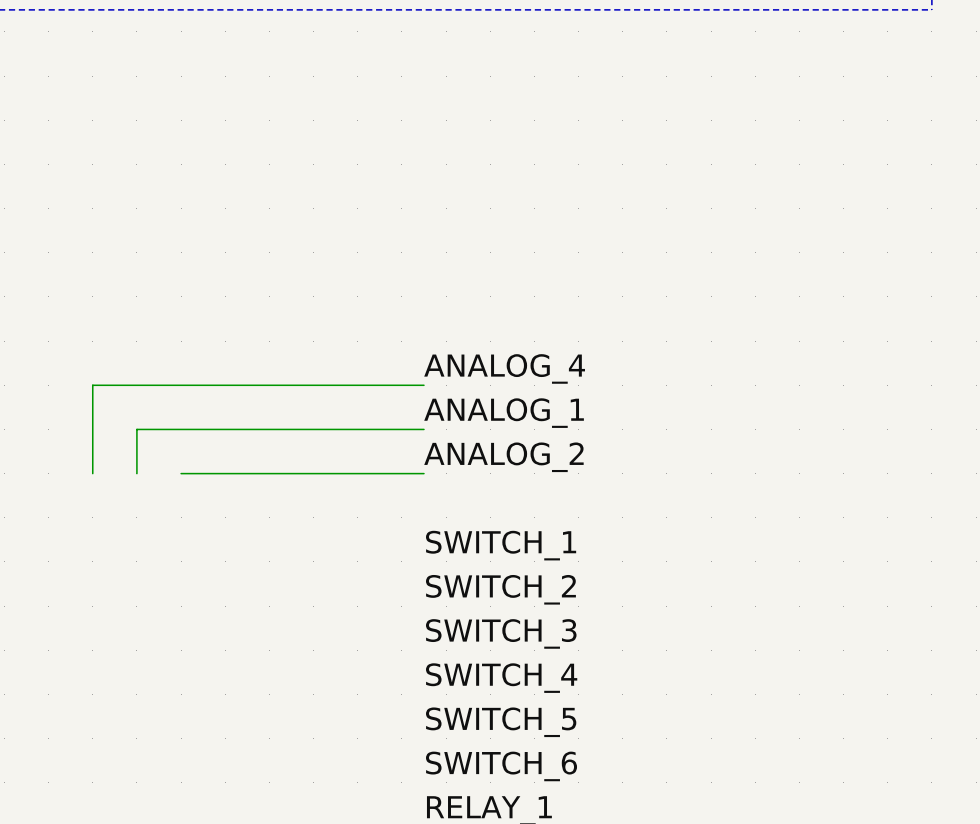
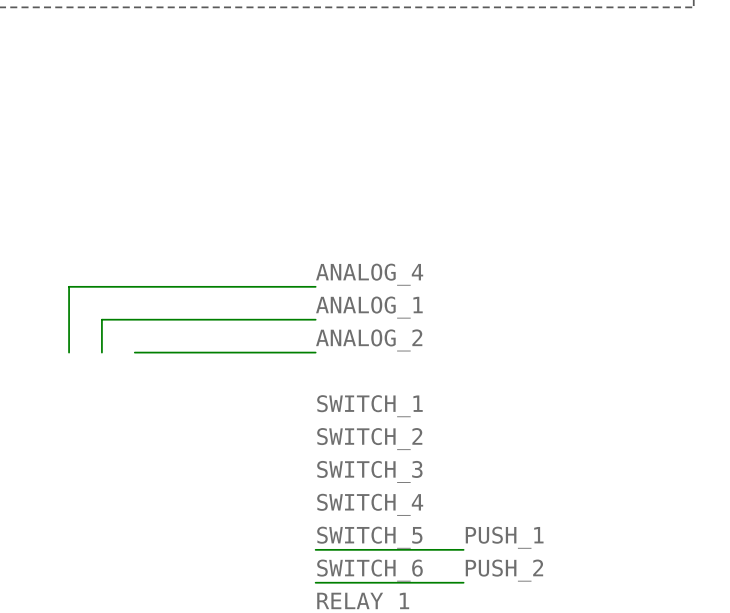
label: none -> PUSH_1 (504, 537)
wire: none -> (315, 549) (463, 549)
label: none -> PUSH_2 (504, 570)
wire: none -> (315, 582) (463, 582)

